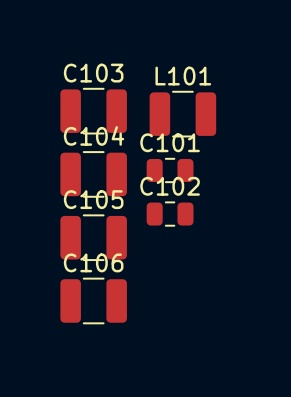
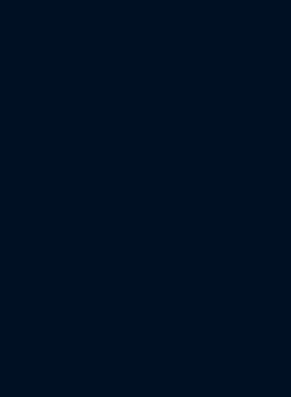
C103: (93, 111) -> none
L101: (182, 114) -> none
C101: (170, 170) -> none
C104: (93, 174) -> none
C102: (170, 214) -> none
C105: (93, 237) -> none
C106: (93, 300) -> none

